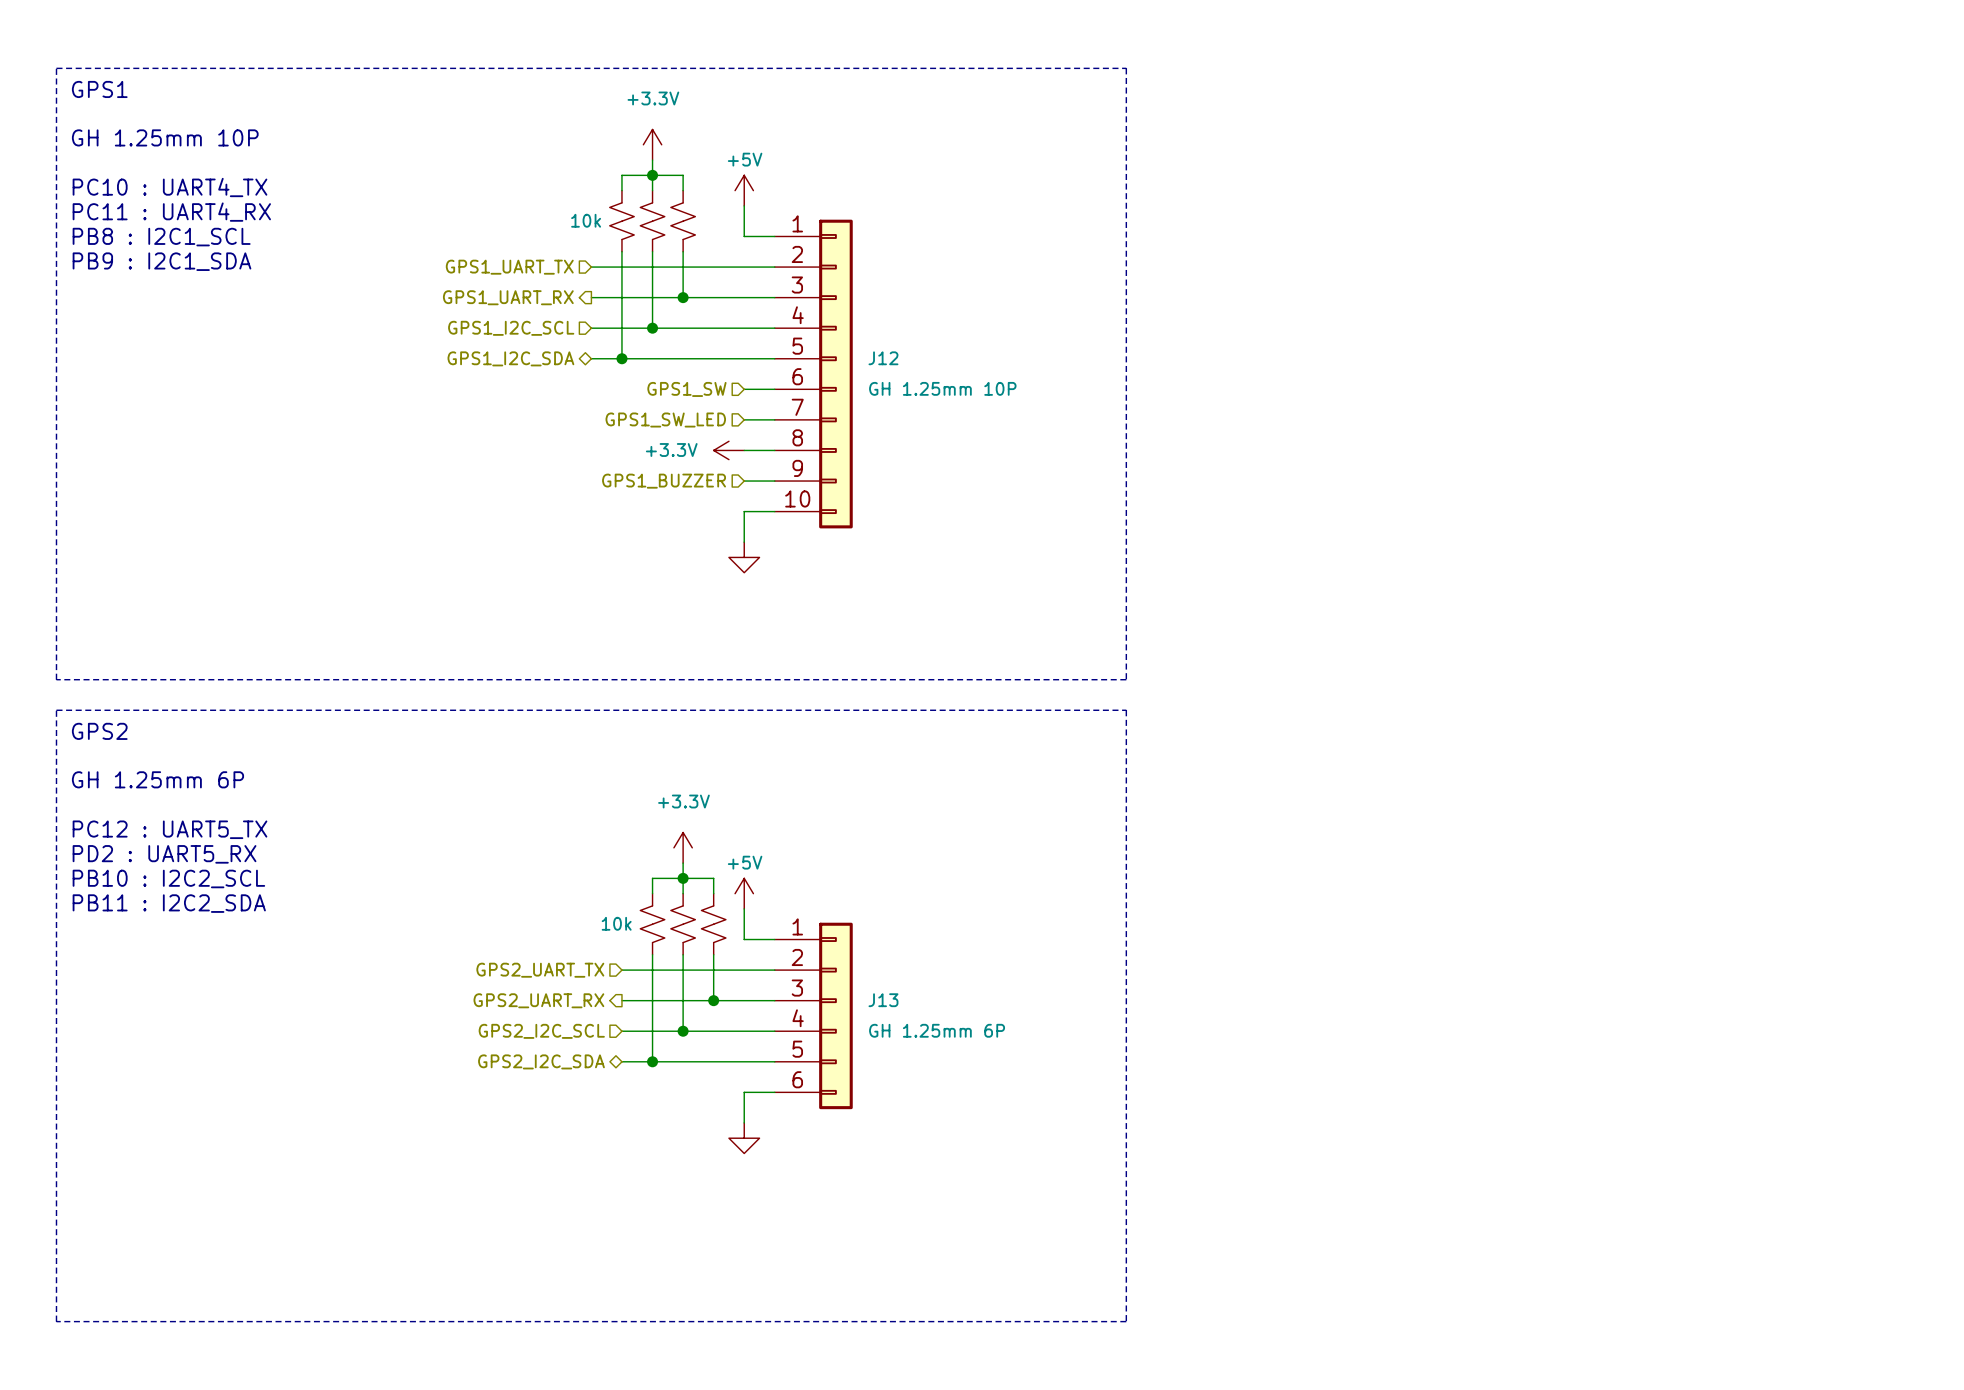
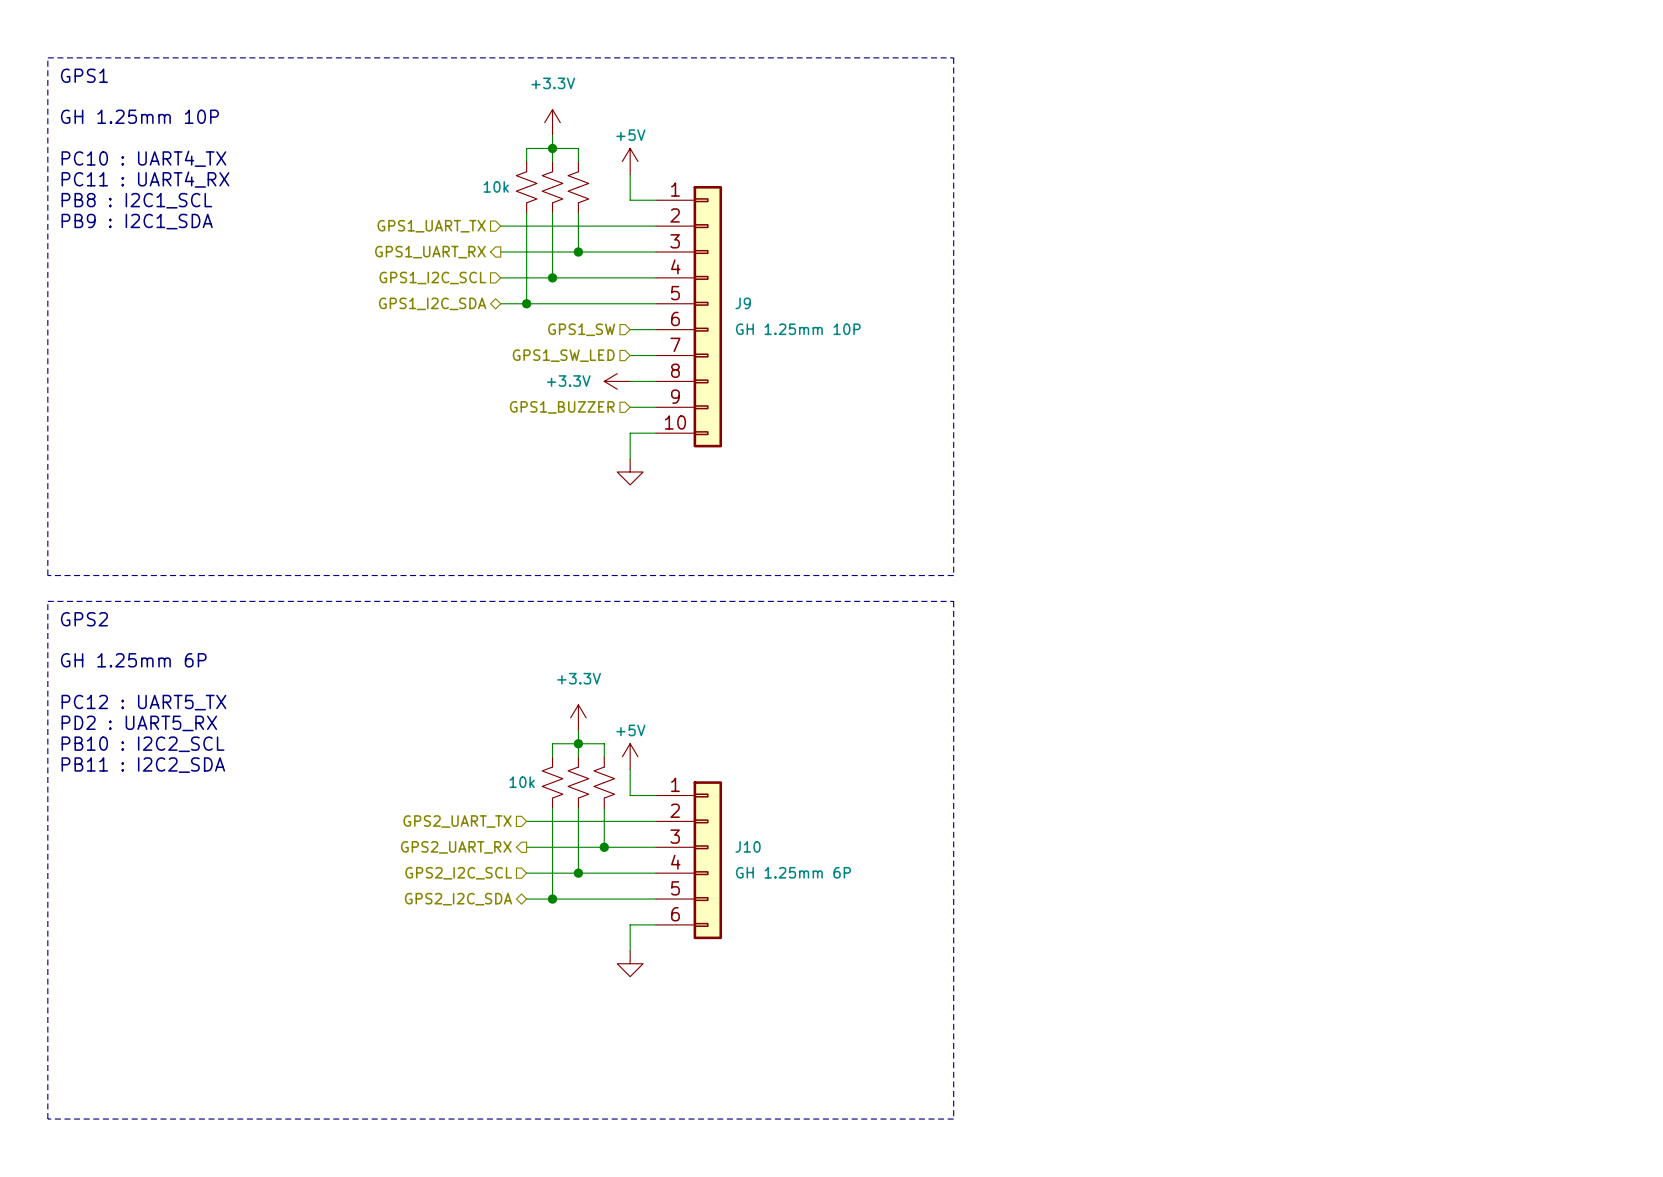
J12 name: J12 (883, 358) -> J9 (743, 303)
J13 name: J13 (883, 1000) -> J10 (748, 846)

